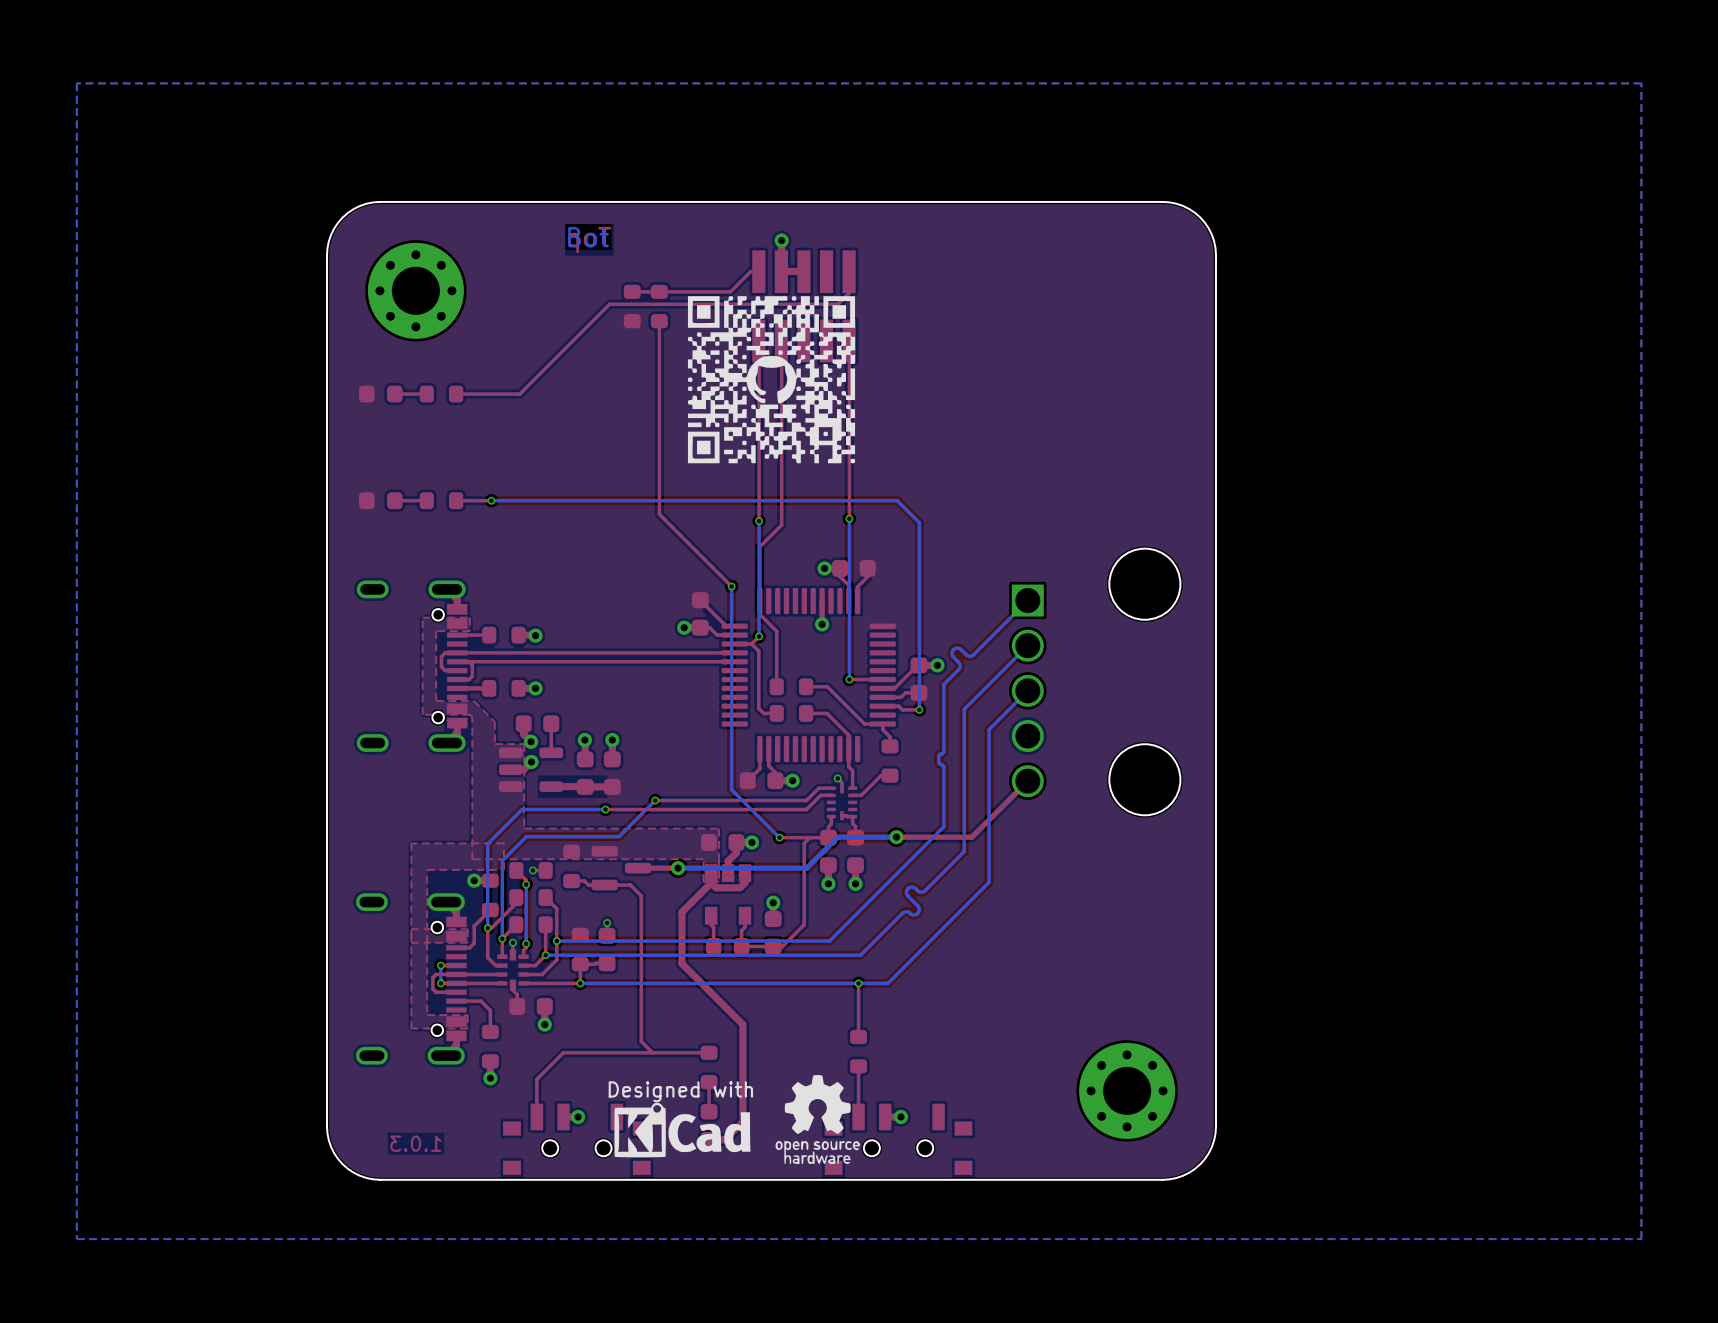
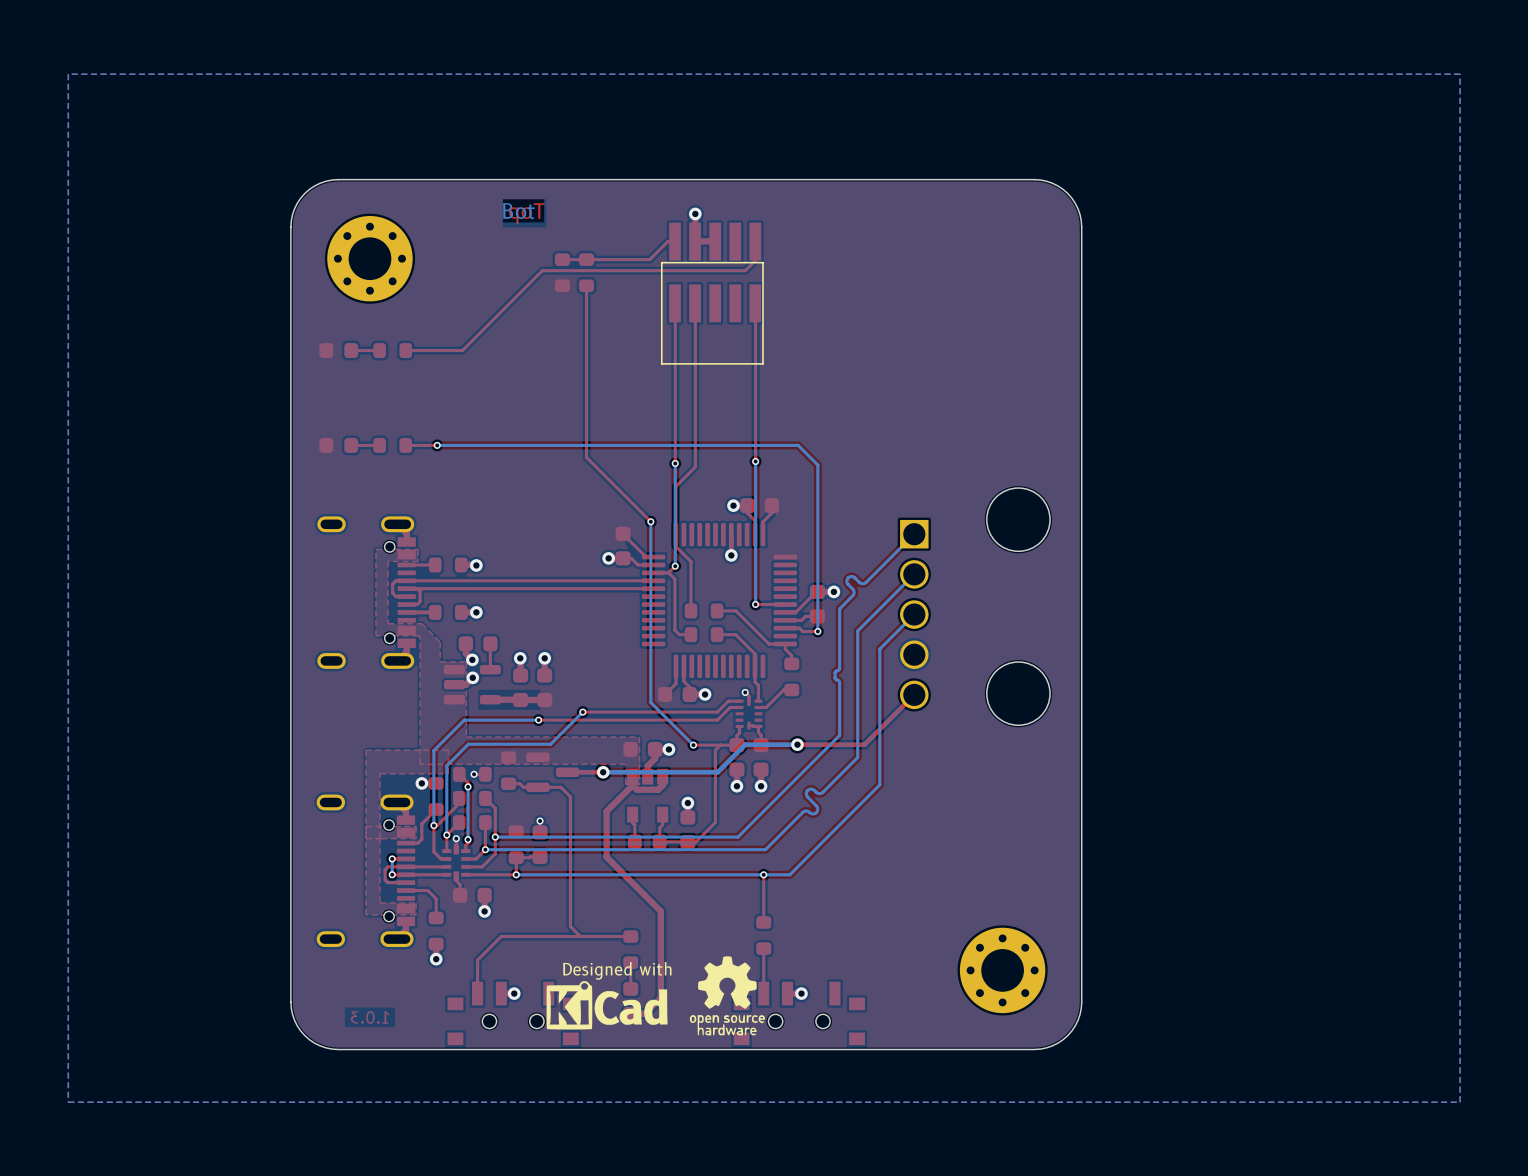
line: none -> (763, 262) (661, 262) (661, 363) (763, 363) (763, 262)
drawing: [687, 296, 856, 464] -> none

